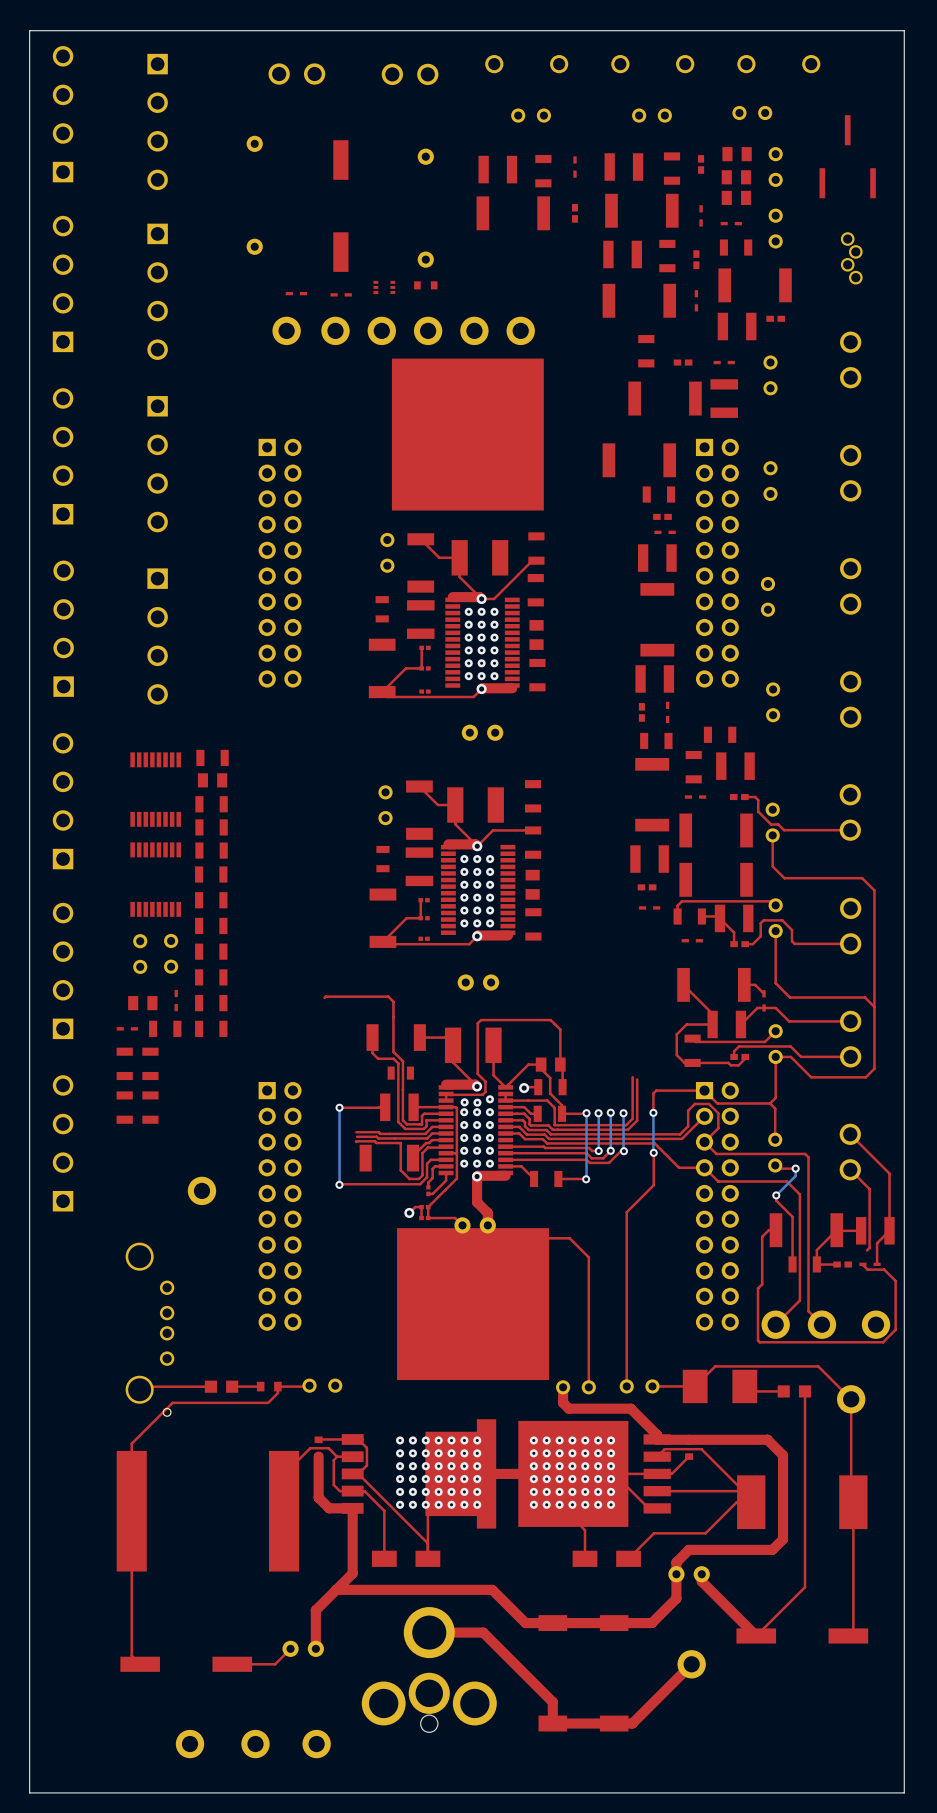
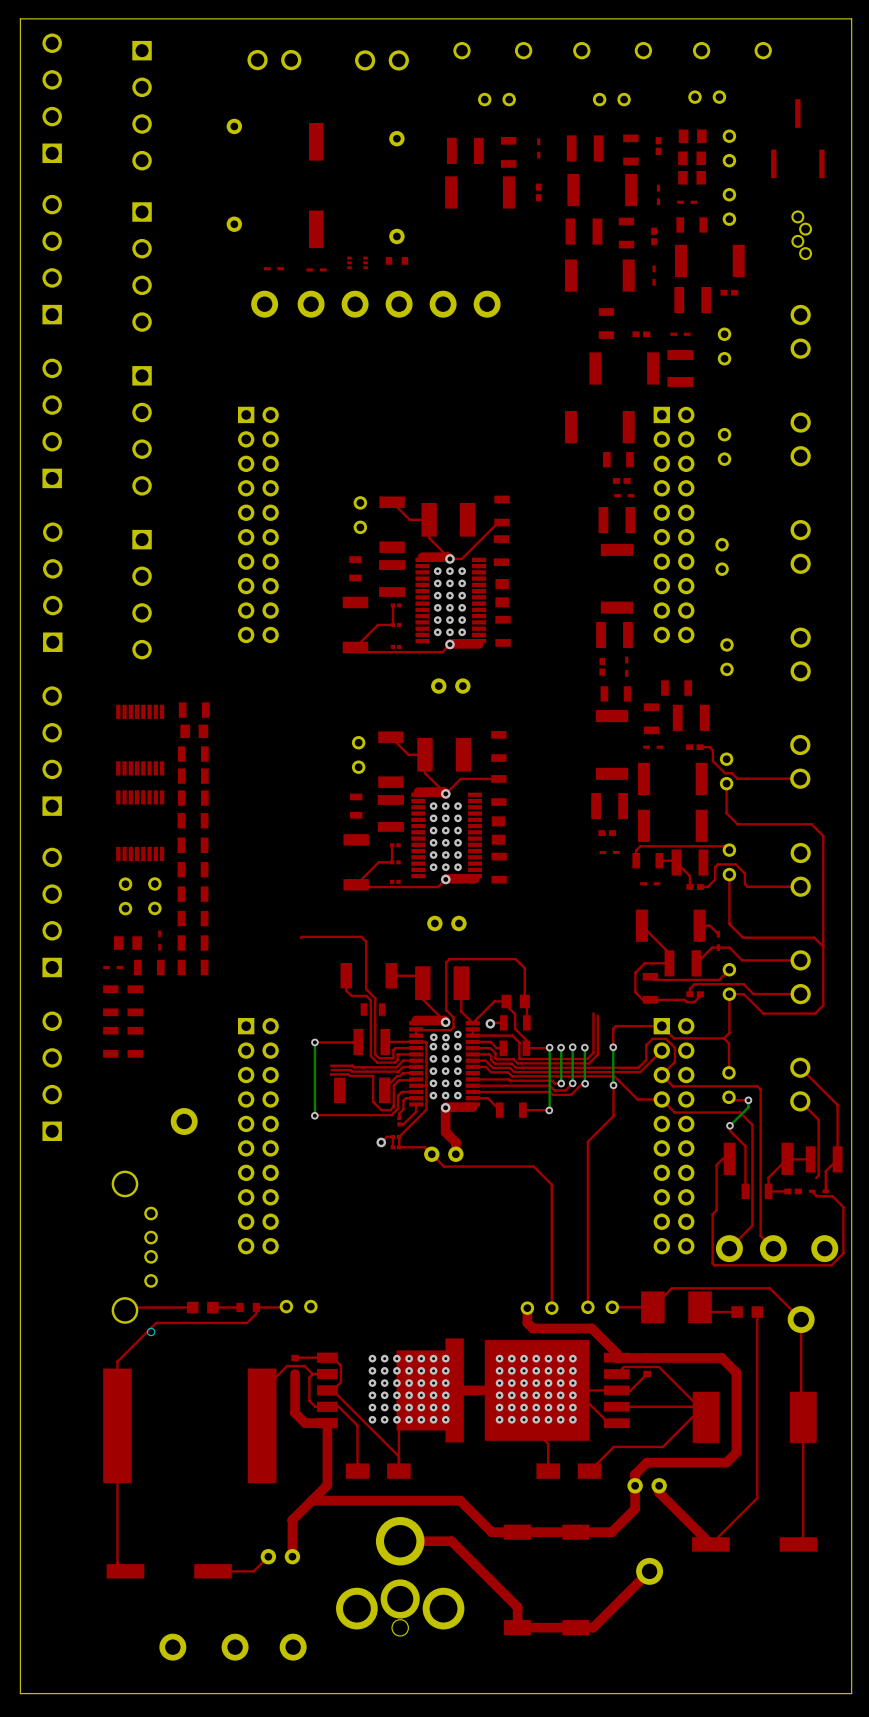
part: (467, 434) -> none
part: (473, 1304) -> none

